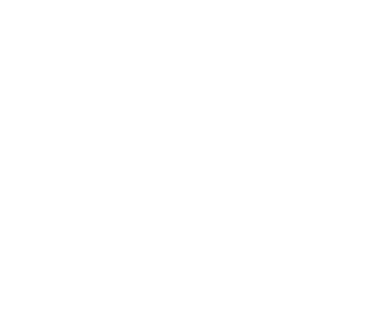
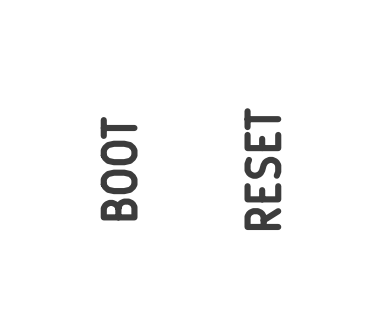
text: none -> BOOT (119, 168)
text: none -> RESET (262, 169)

